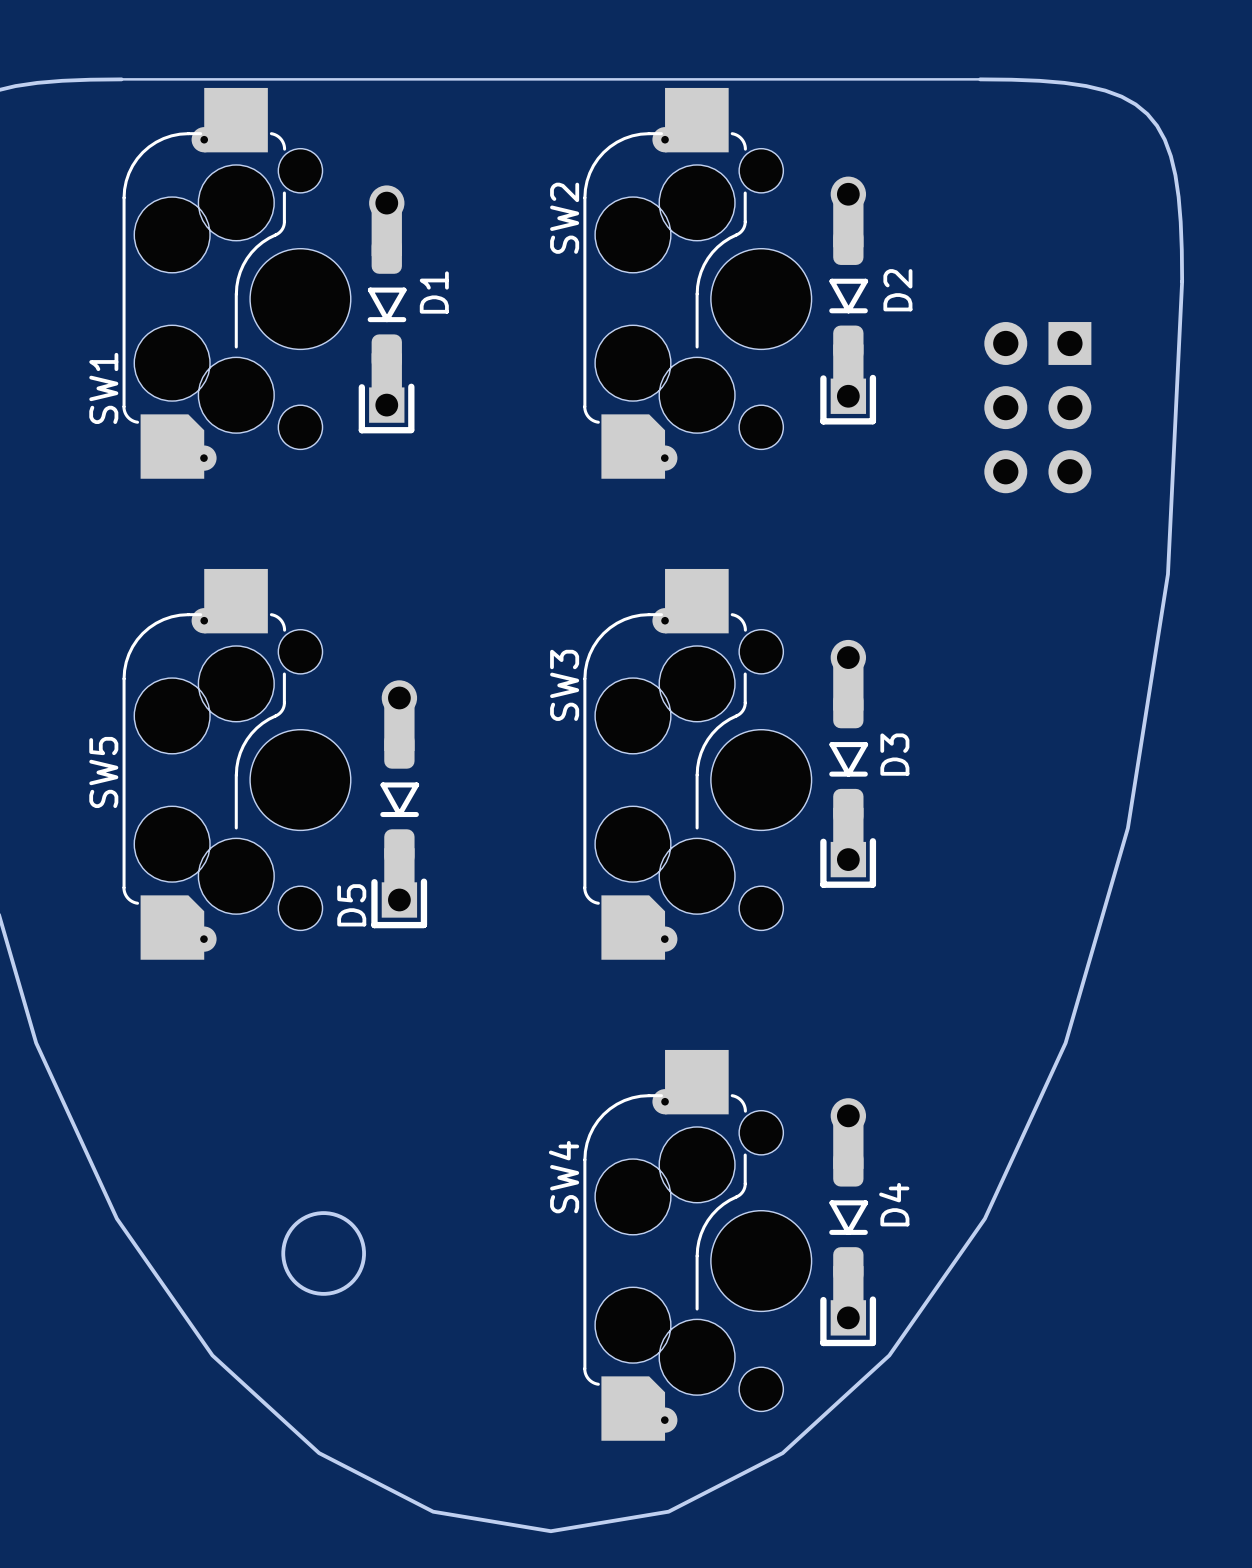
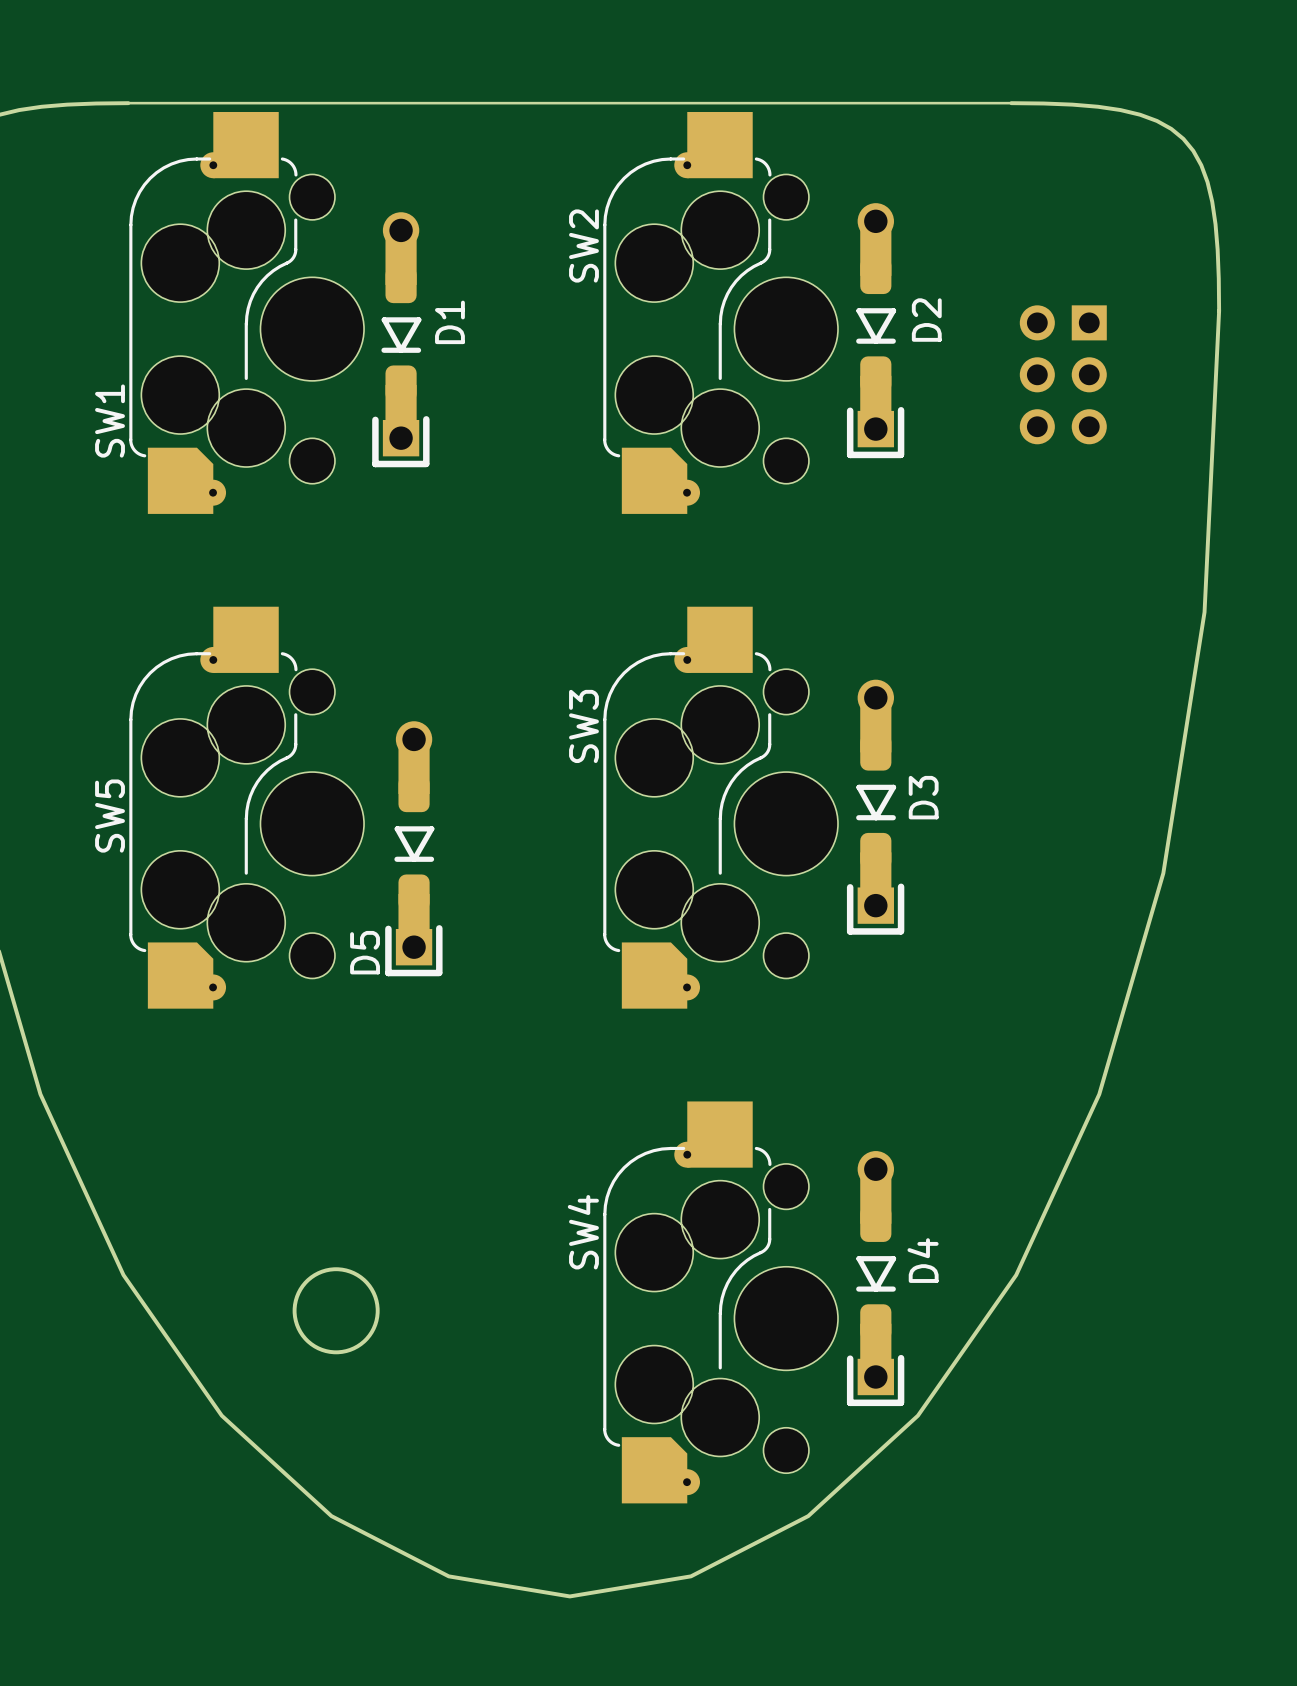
part: none -> (1063, 374)
part: (1037, 407) -> none

